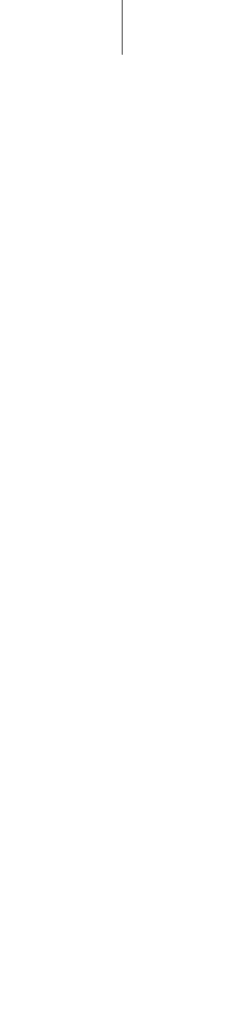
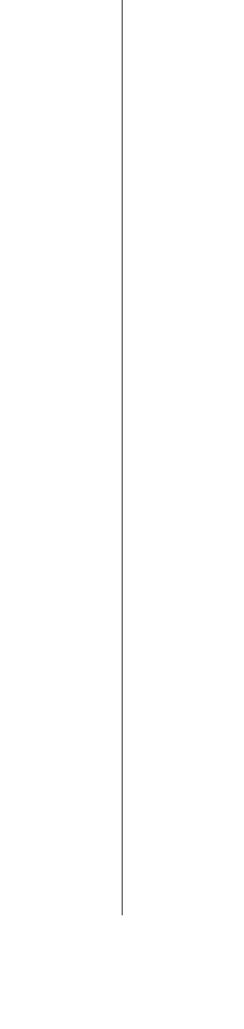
bus: none -> (122, 54) (122, 914)

